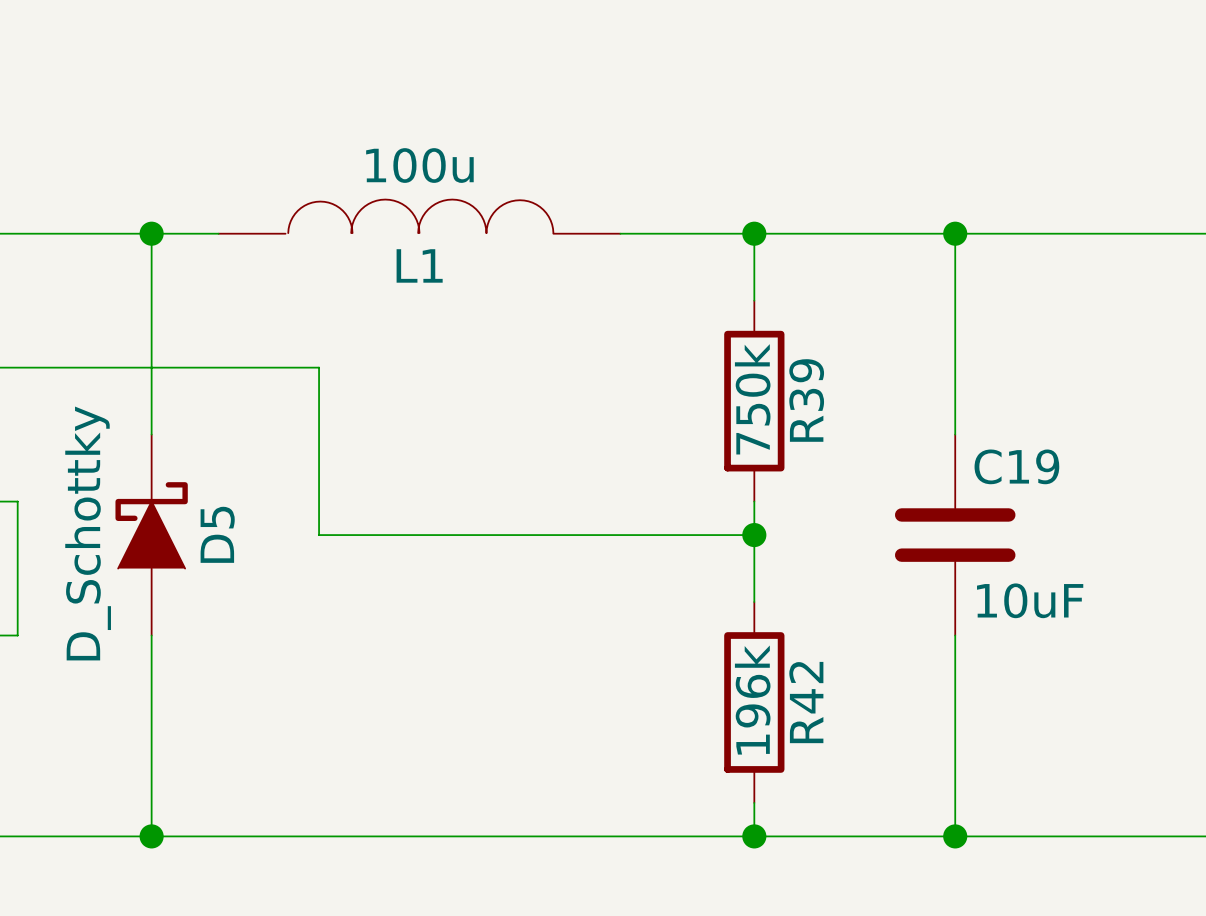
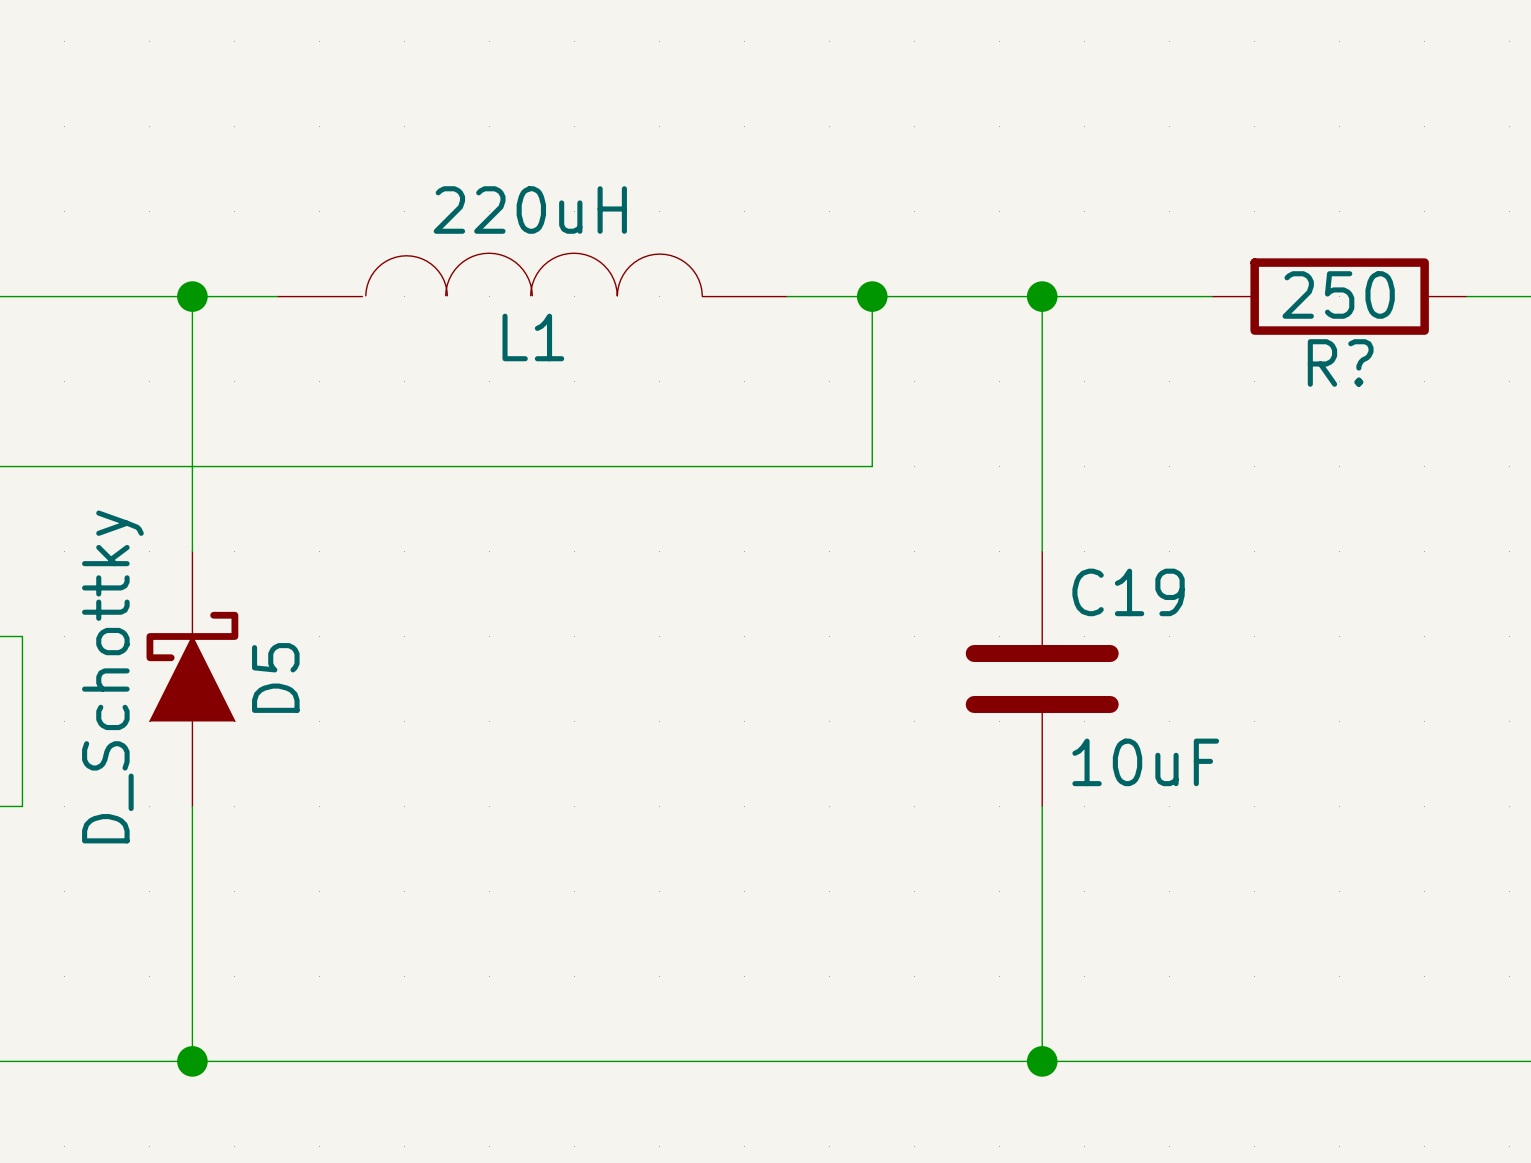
L1 value: 100u (419, 165) -> 220uH (530, 210)
junction: none -> (872, 296)
wire: (754, 233) (754, 300) -> none
junction: (754, 233) -> none
wire: none -> (1042, 296) (1042, 551)
junction: none -> (1042, 296)
junction: (955, 233) -> none
R?: none -> 250 (1339, 296)
wire: (1156, 233) (955, 233) (955, 434) -> none
wire: (319, 367) (319, 535) (754, 535) -> (404, 466) (872, 466) (872, 296)
R39: 750k (754, 401) -> none
wire: (754, 501) (754, 602) -> none
junction: (754, 535) -> none
C19 position: (955, 535) -> (1042, 678)
wire: (955, 635) (955, 836) -> (1042, 806) (1042, 1061)
R42: 196k (754, 702) -> none
wire: (754, 802) (754, 836) -> none
junction: (754, 836) -> none
junction: none -> (1042, 1061)
junction: (955, 836) -> none

